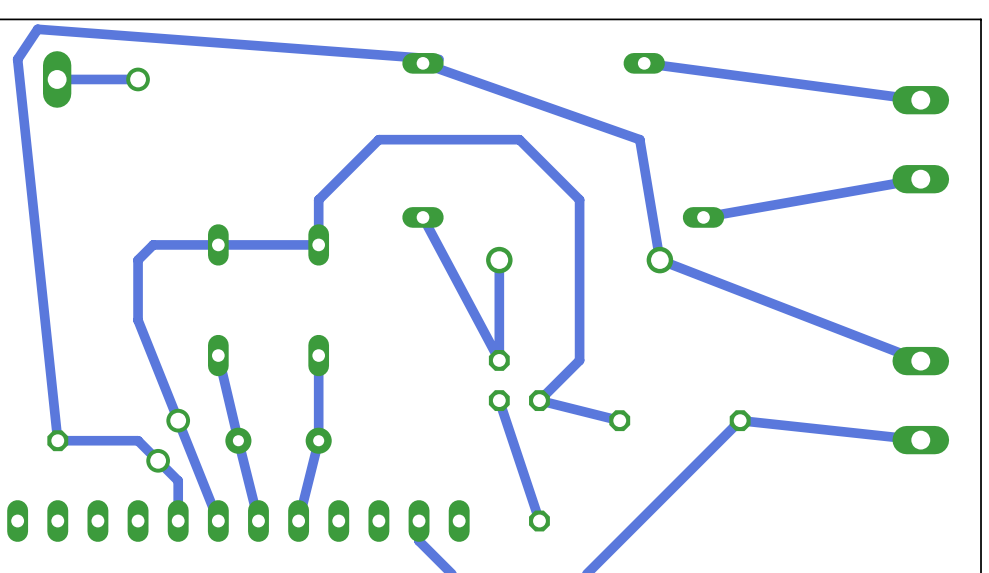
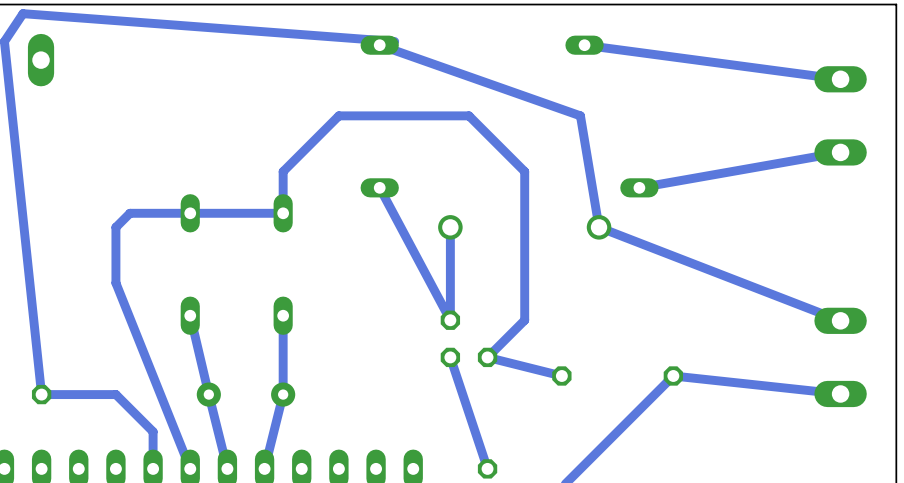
bottom track: (138, 79) (57, 79) -> none
via: (138, 79) -> none
via: (178, 420) -> none
via: (158, 460) -> none

